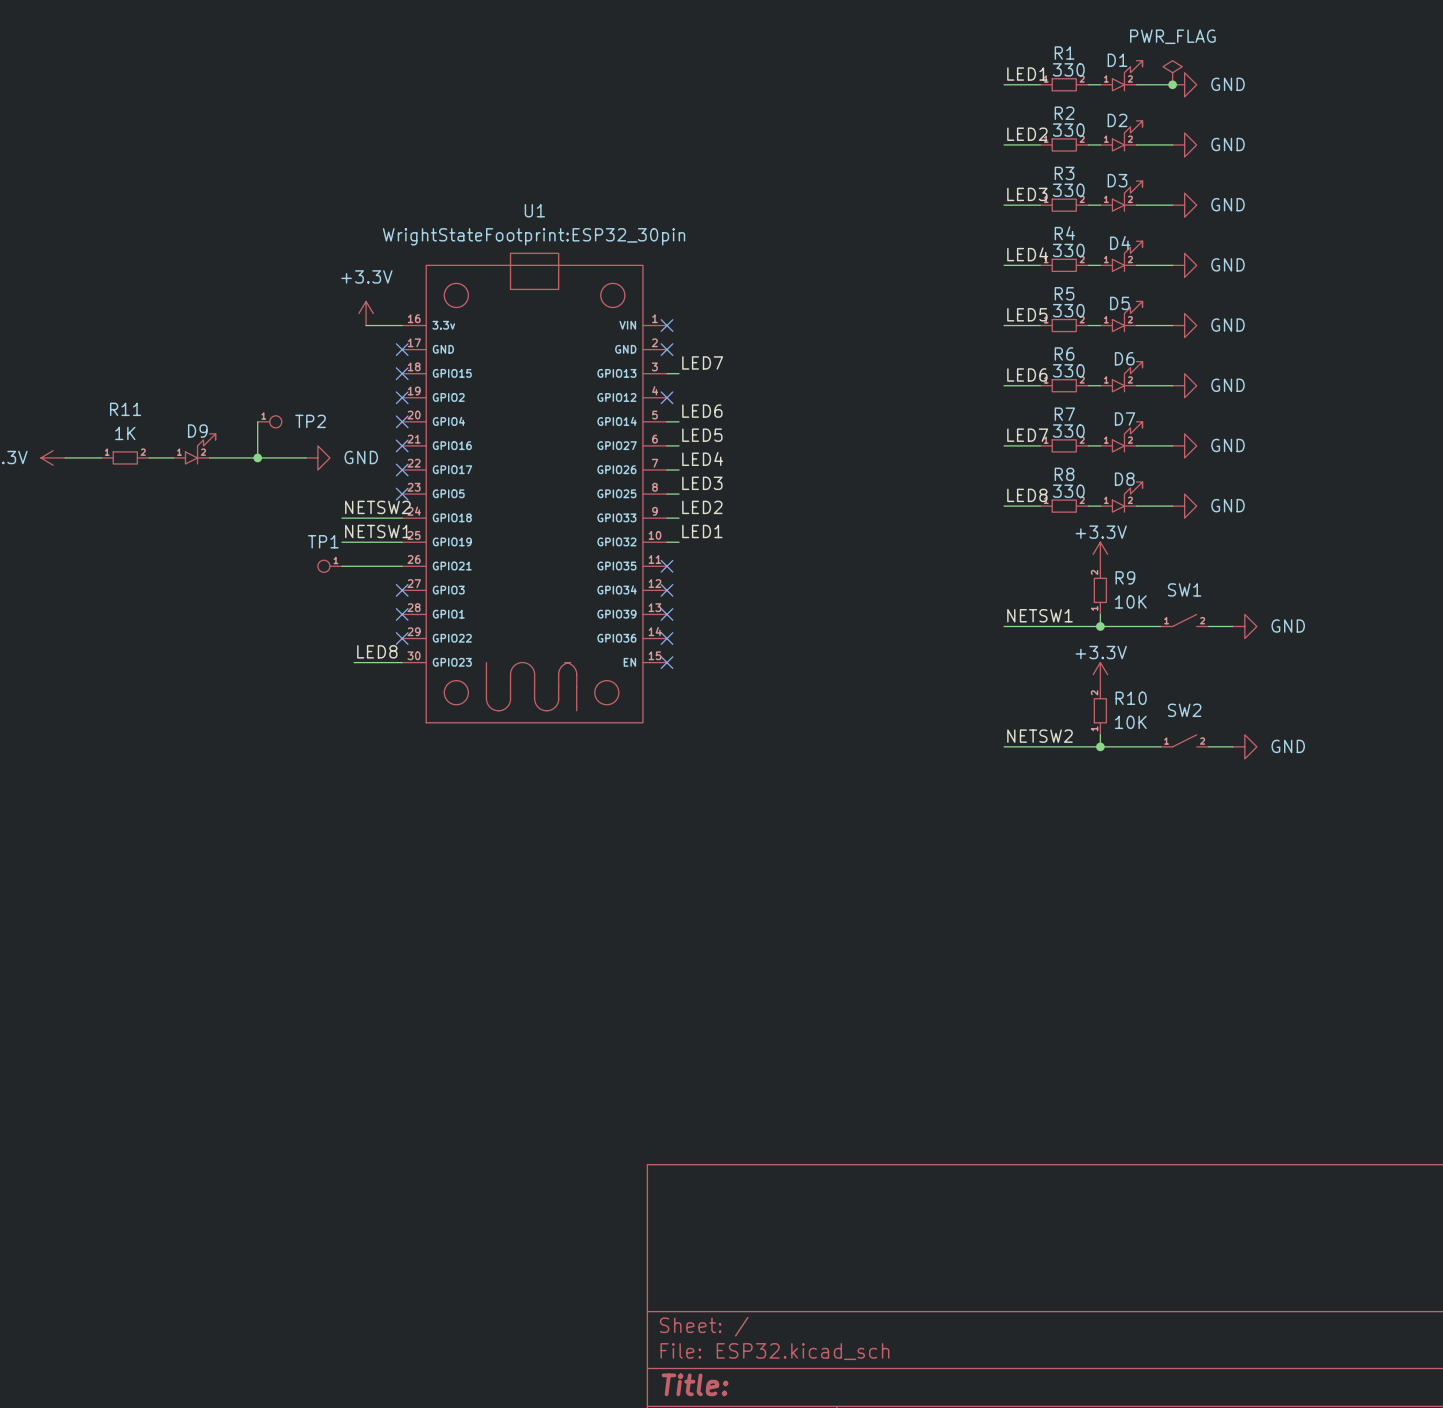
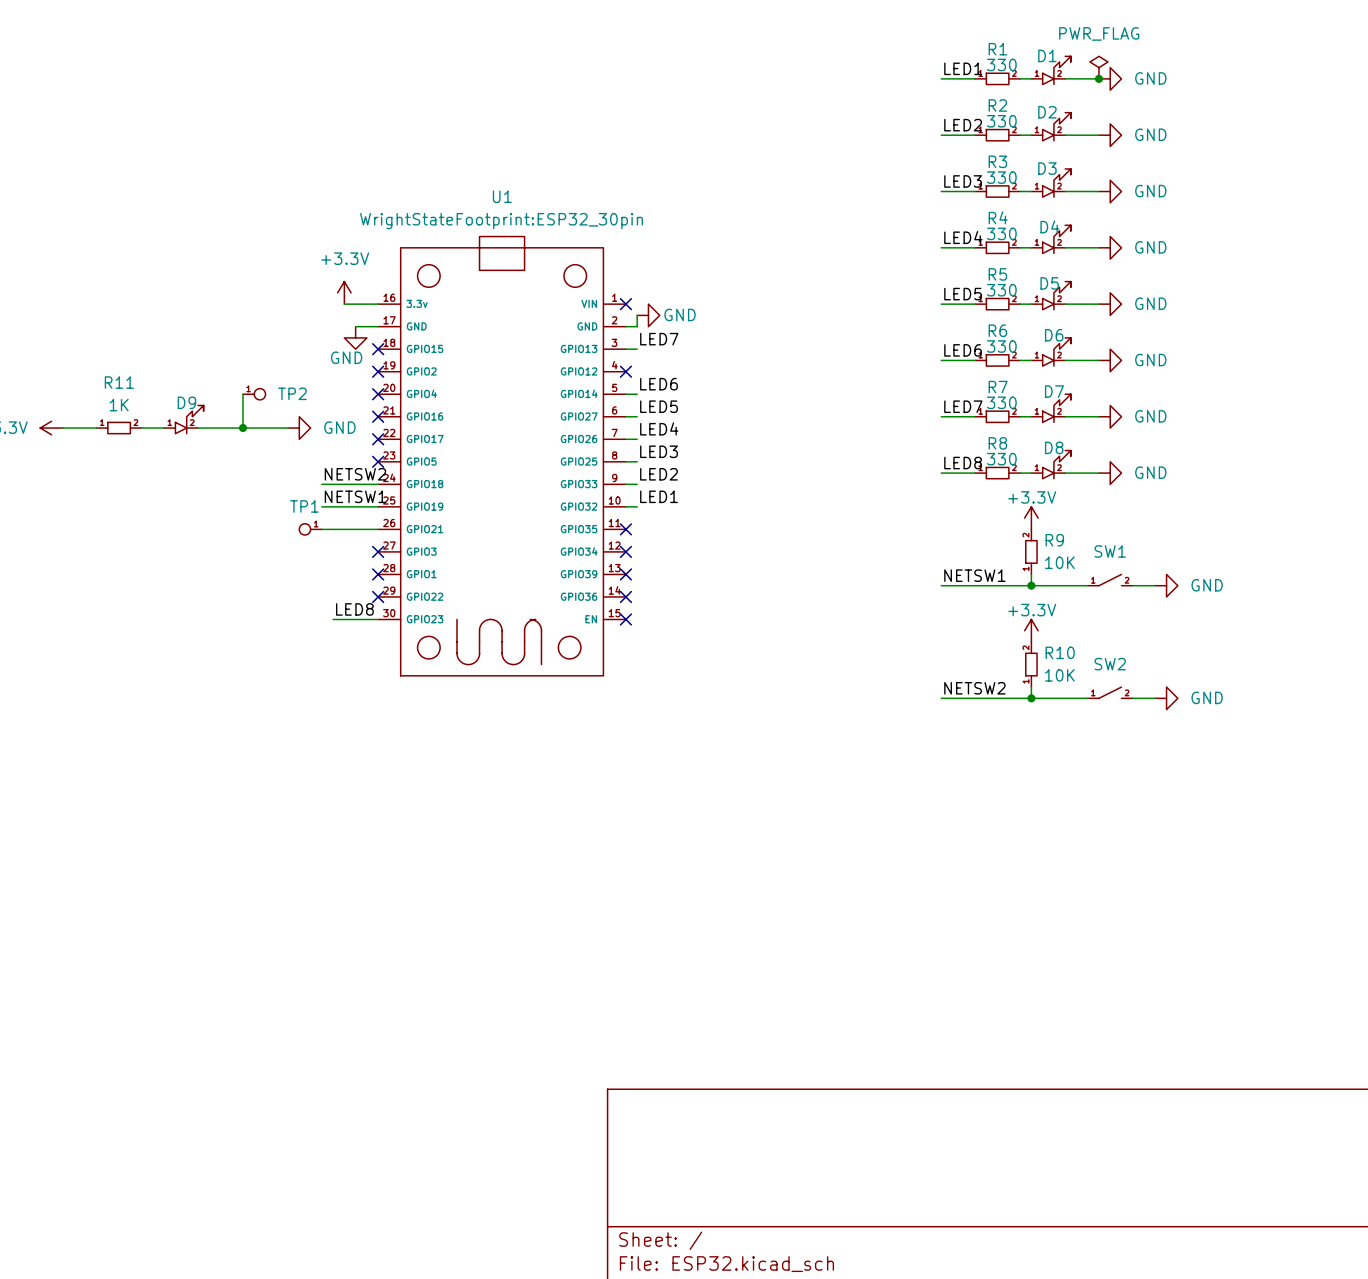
wire: none -> (637, 315) (637, 326) (625, 326)
power symbol: none -> GND (648, 315)
wire: none -> (355, 326) (378, 326)
no-connect mark: (402, 349) -> none
no-connect mark: (667, 349) -> none
power symbol: none -> GND (355, 337)

